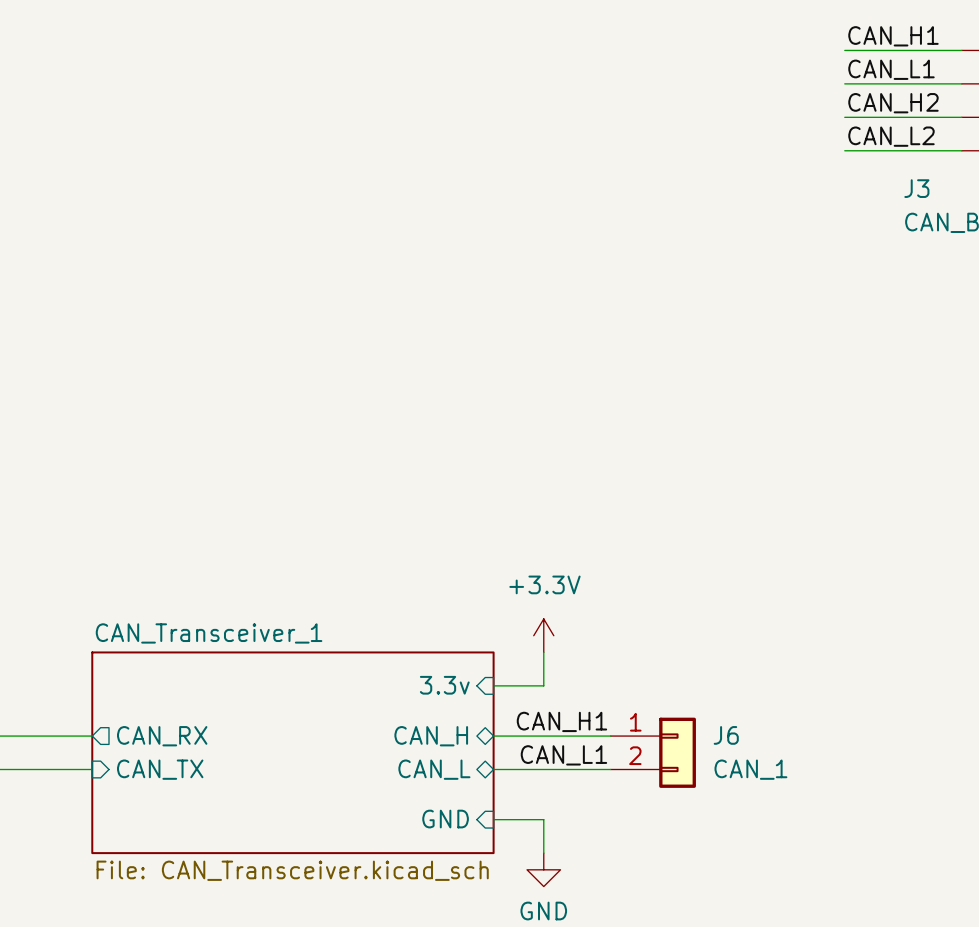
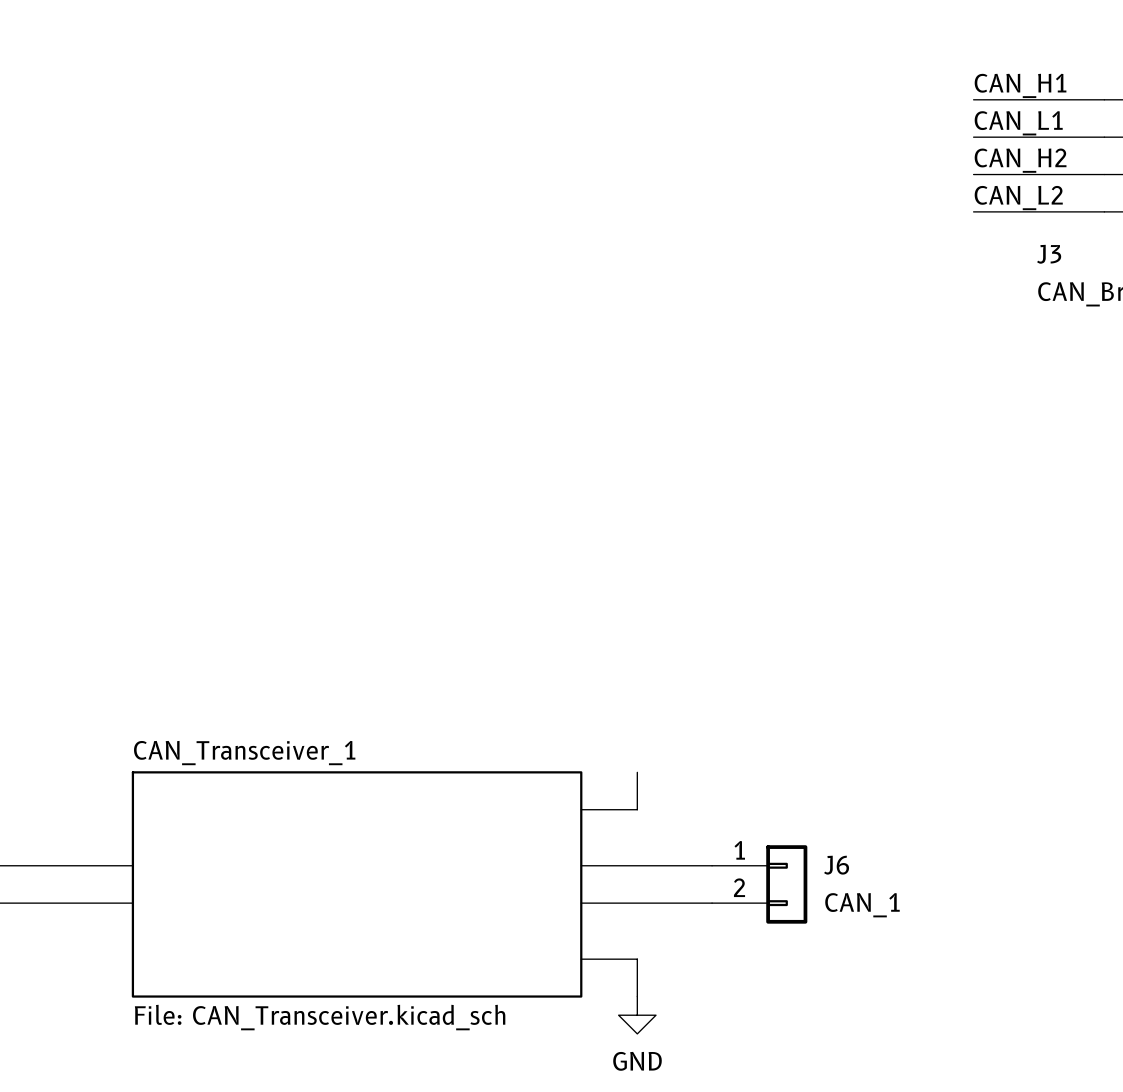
power symbol: +3.3V (543, 635) -> none
sheet pin: 3.3v (444, 685) -> none
label: CAN_H1 (561, 721) -> none
sheet pin: CAN_RX (162, 736) -> none
sheet pin: CAN_H (431, 736) -> none
label: CAN_L1 (563, 755) -> none
sheet pin: CAN_TX (160, 769) -> none
sheet pin: CAN_L (434, 769) -> none
sheet pin: GND (445, 819) -> none

